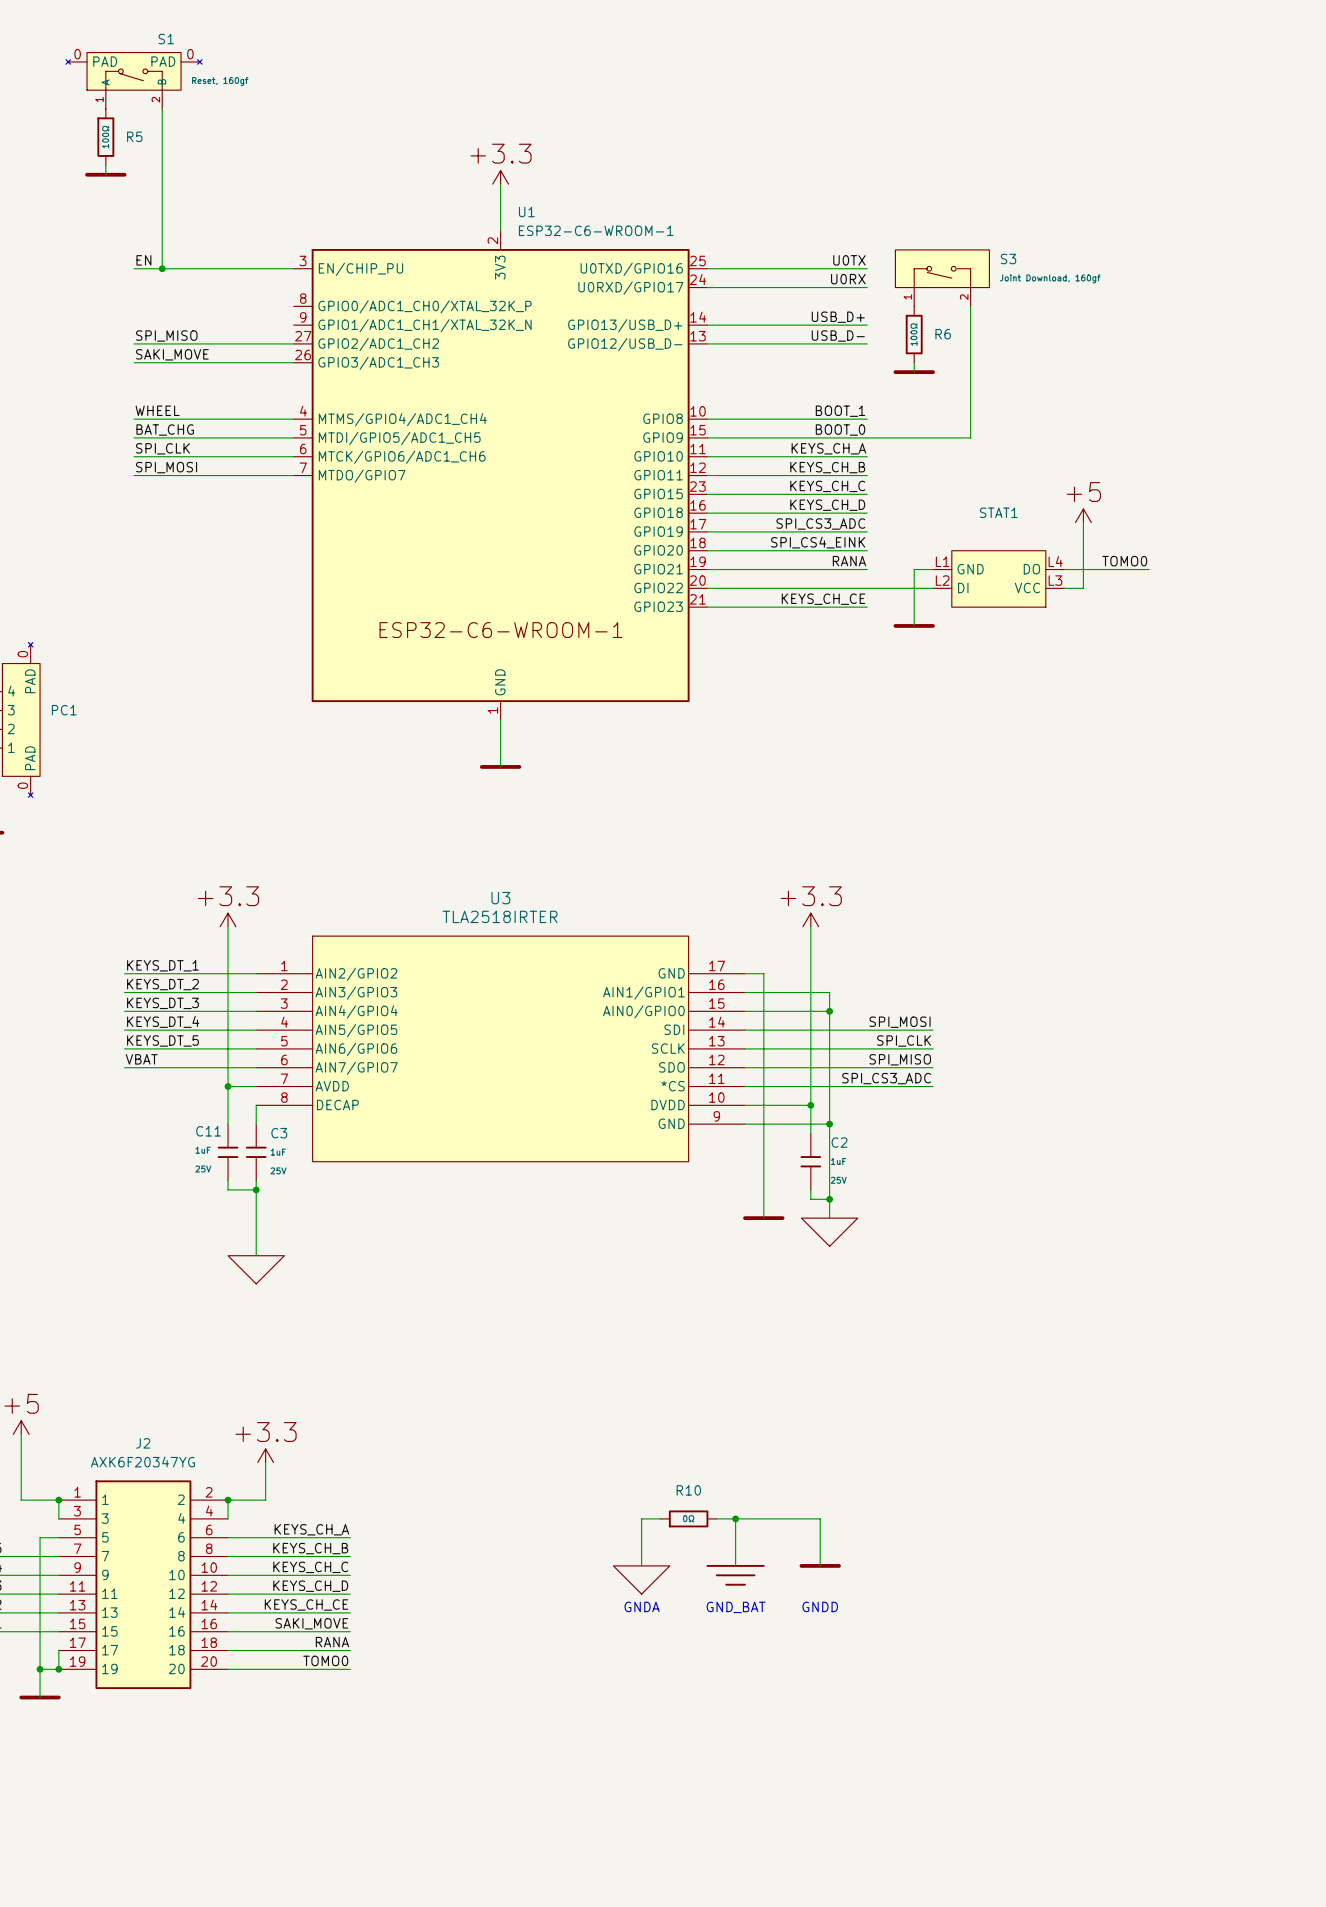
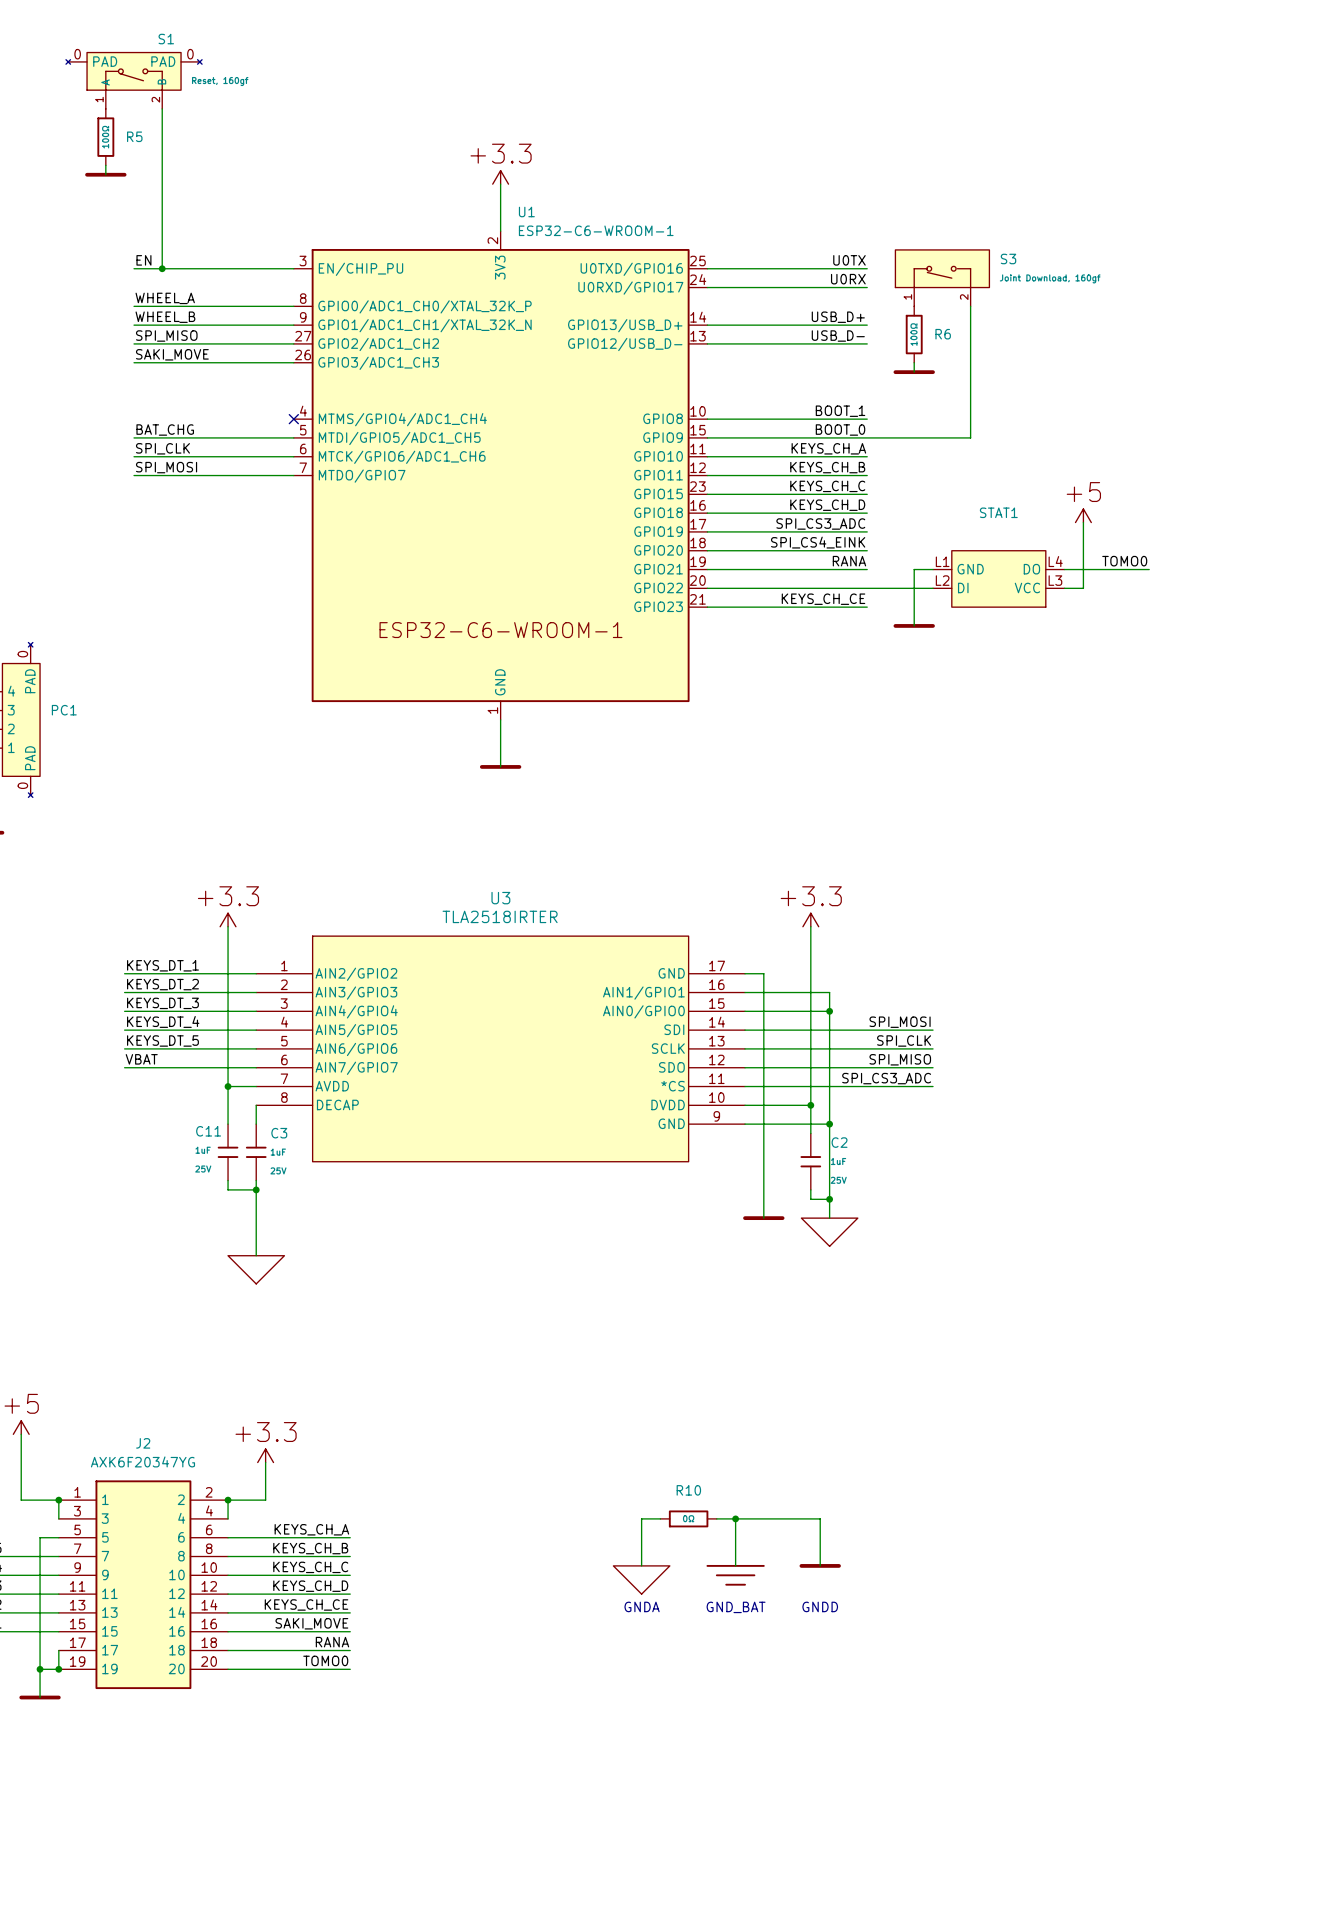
label: none -> WHEEL_A (165, 298)
wire: none -> (134, 306) (293, 306)
label: none -> WHEEL_B (165, 317)
label: WHEEL (157, 410) -> none
wire: (134, 419) (293, 419) -> (134, 325) (293, 325)
no-connect mark: none -> (293, 419)

